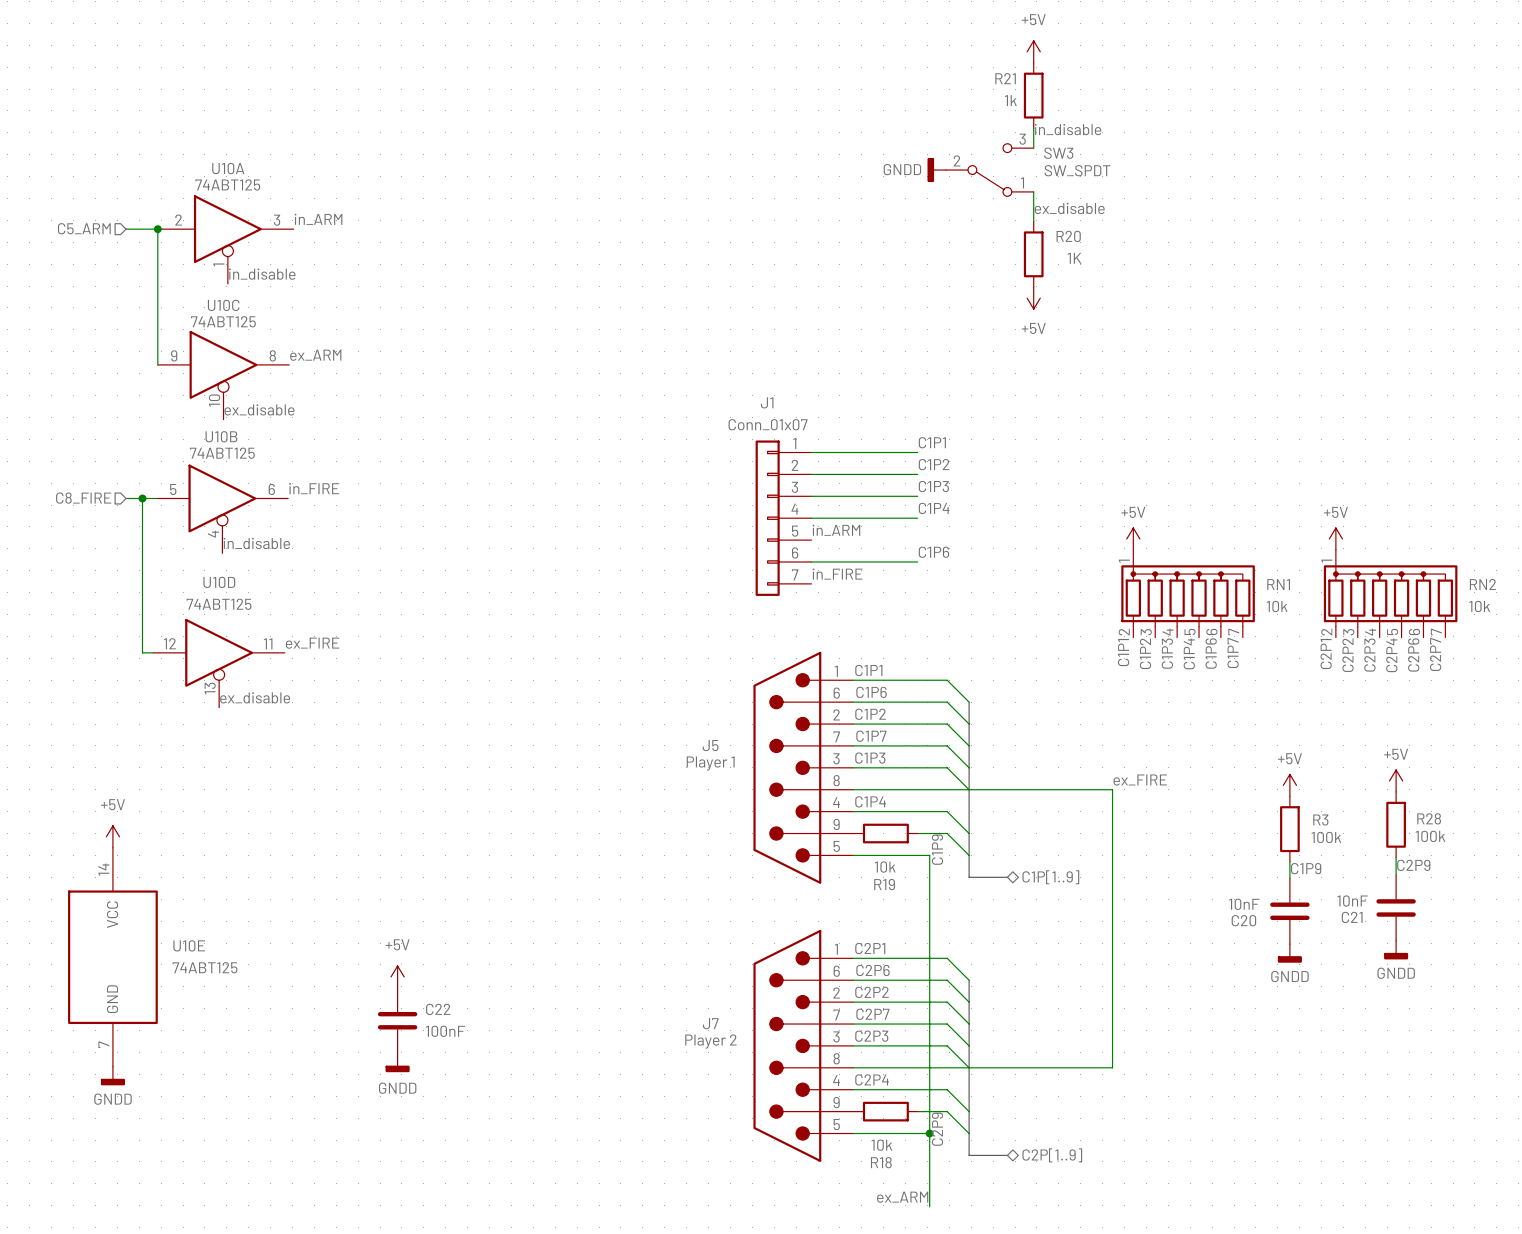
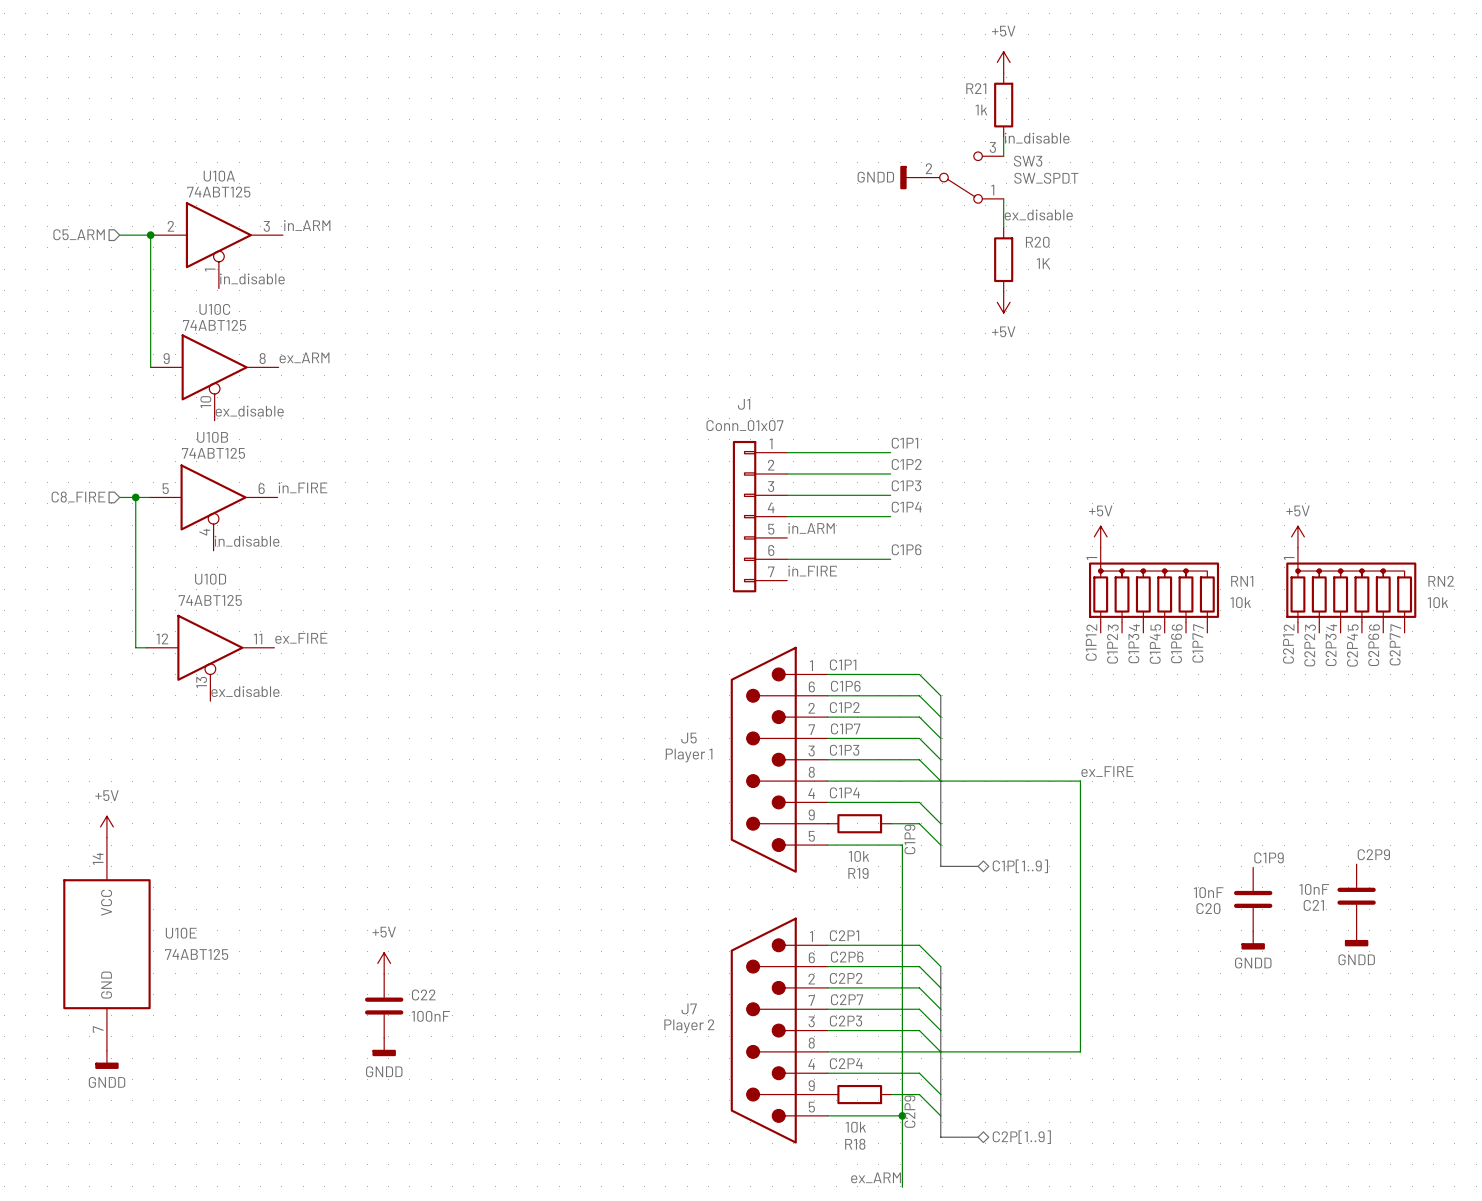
power symbol: +5V (1396, 780) -> none
power symbol: +5V (1289, 785) -> none
R28: 100k (1396, 824) -> none
R3: 100k (1289, 829) -> none
wire: (1396, 857) (1396, 875) -> none
wire: (1289, 861) (1289, 878) -> none

